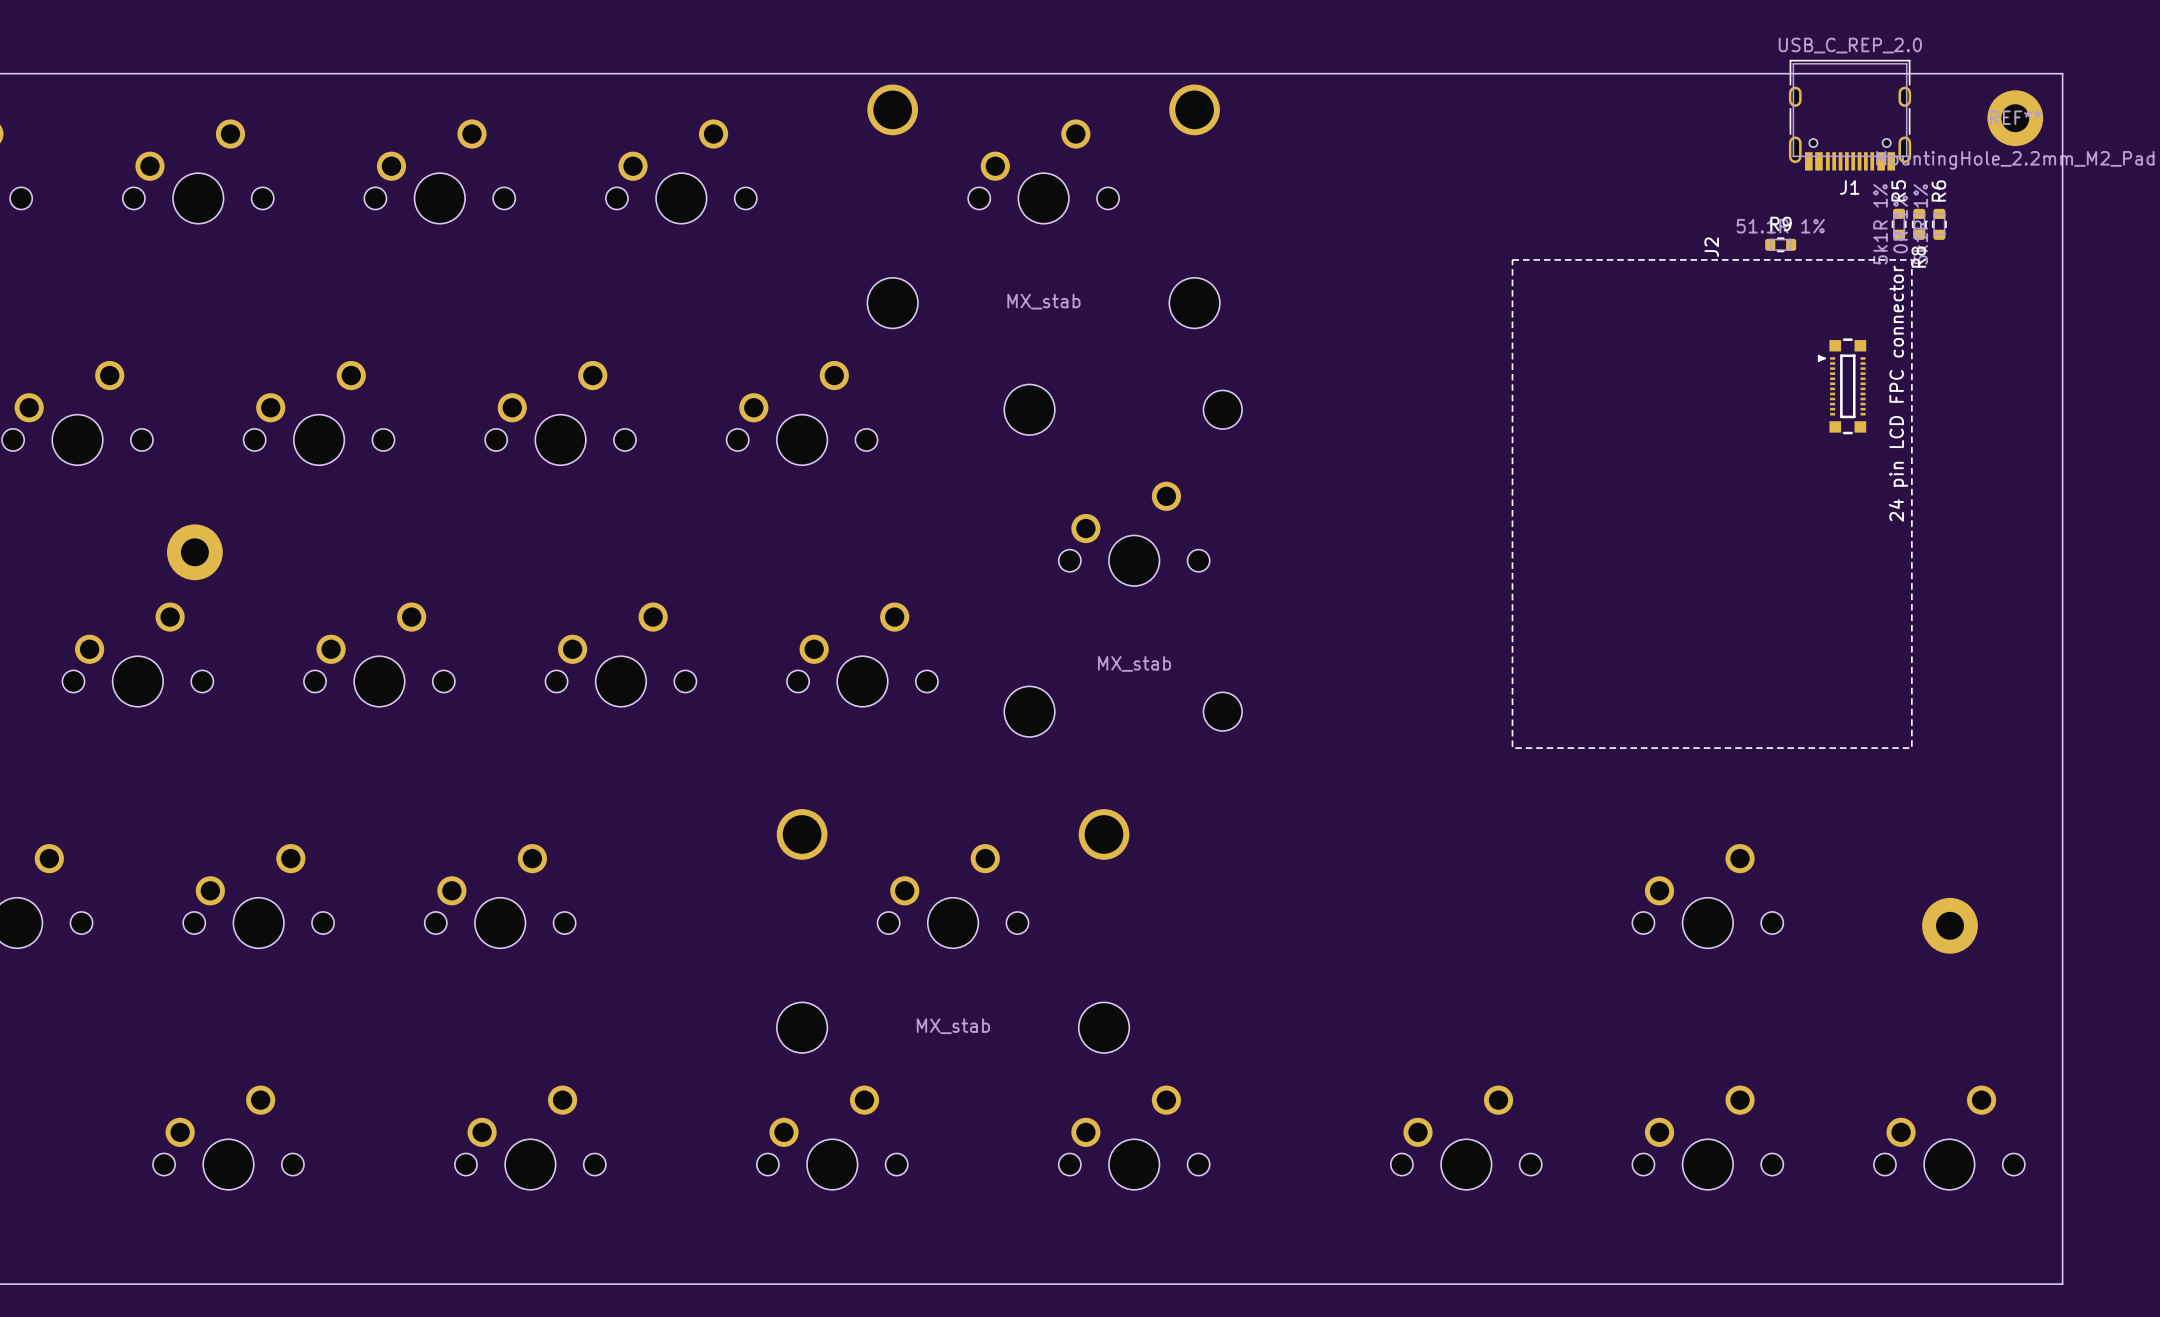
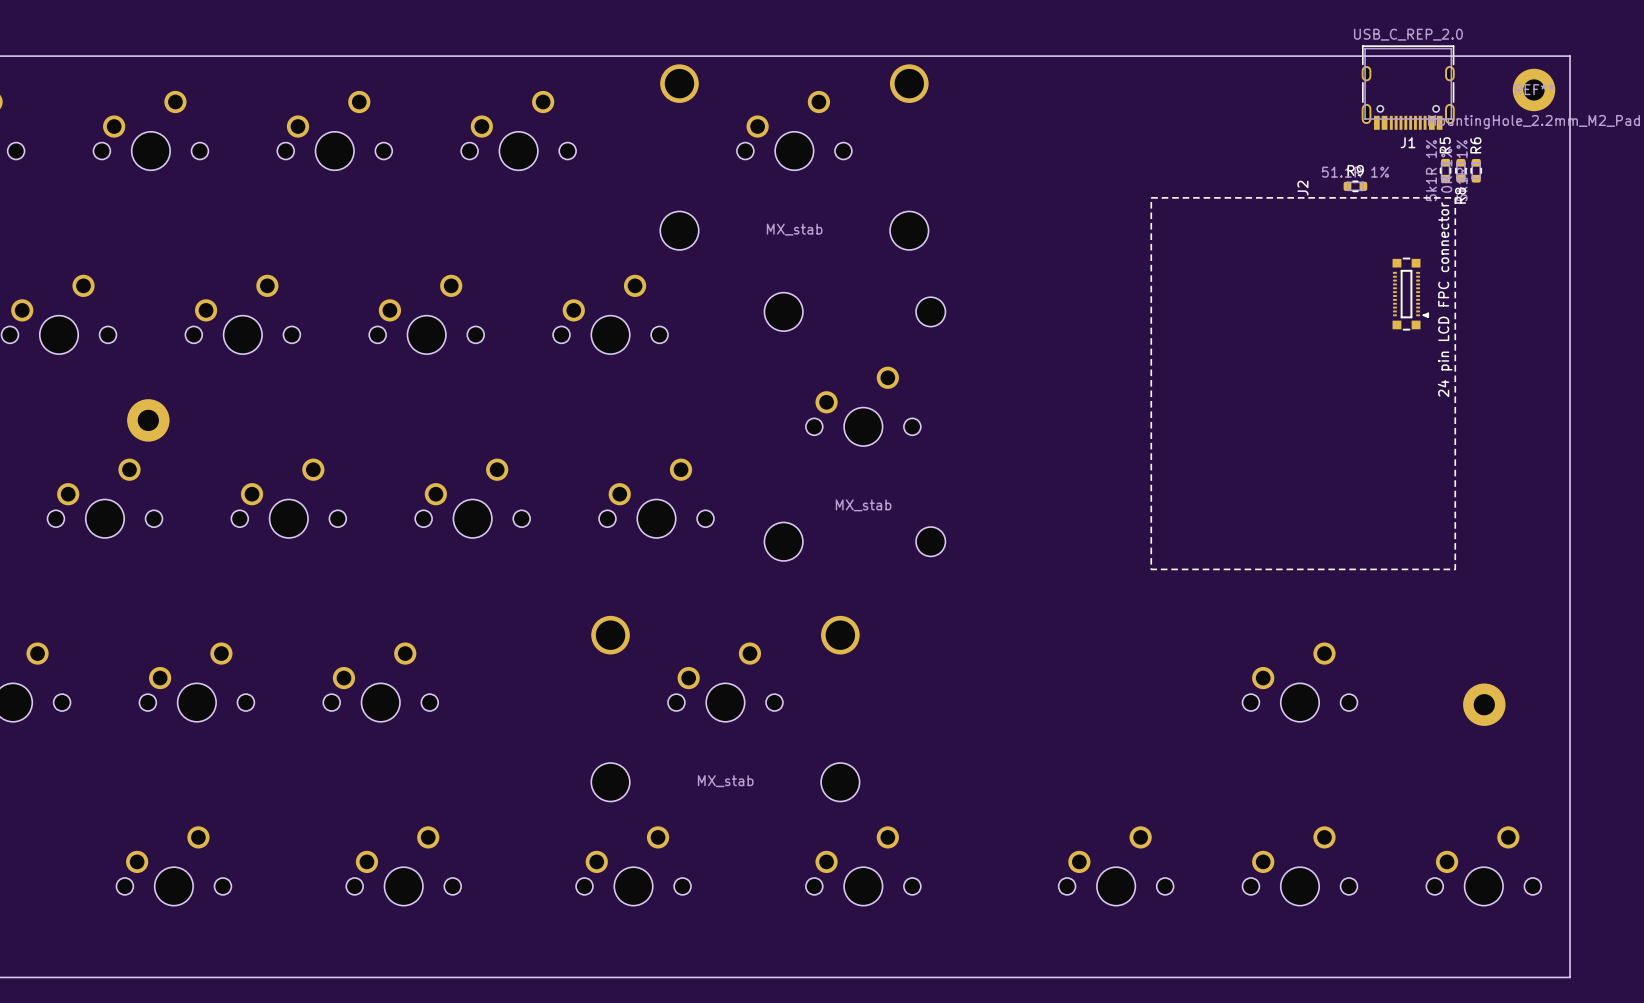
J2 footprint: [1511, 259, 1913, 749] -> [1150, 197, 1456, 570]

